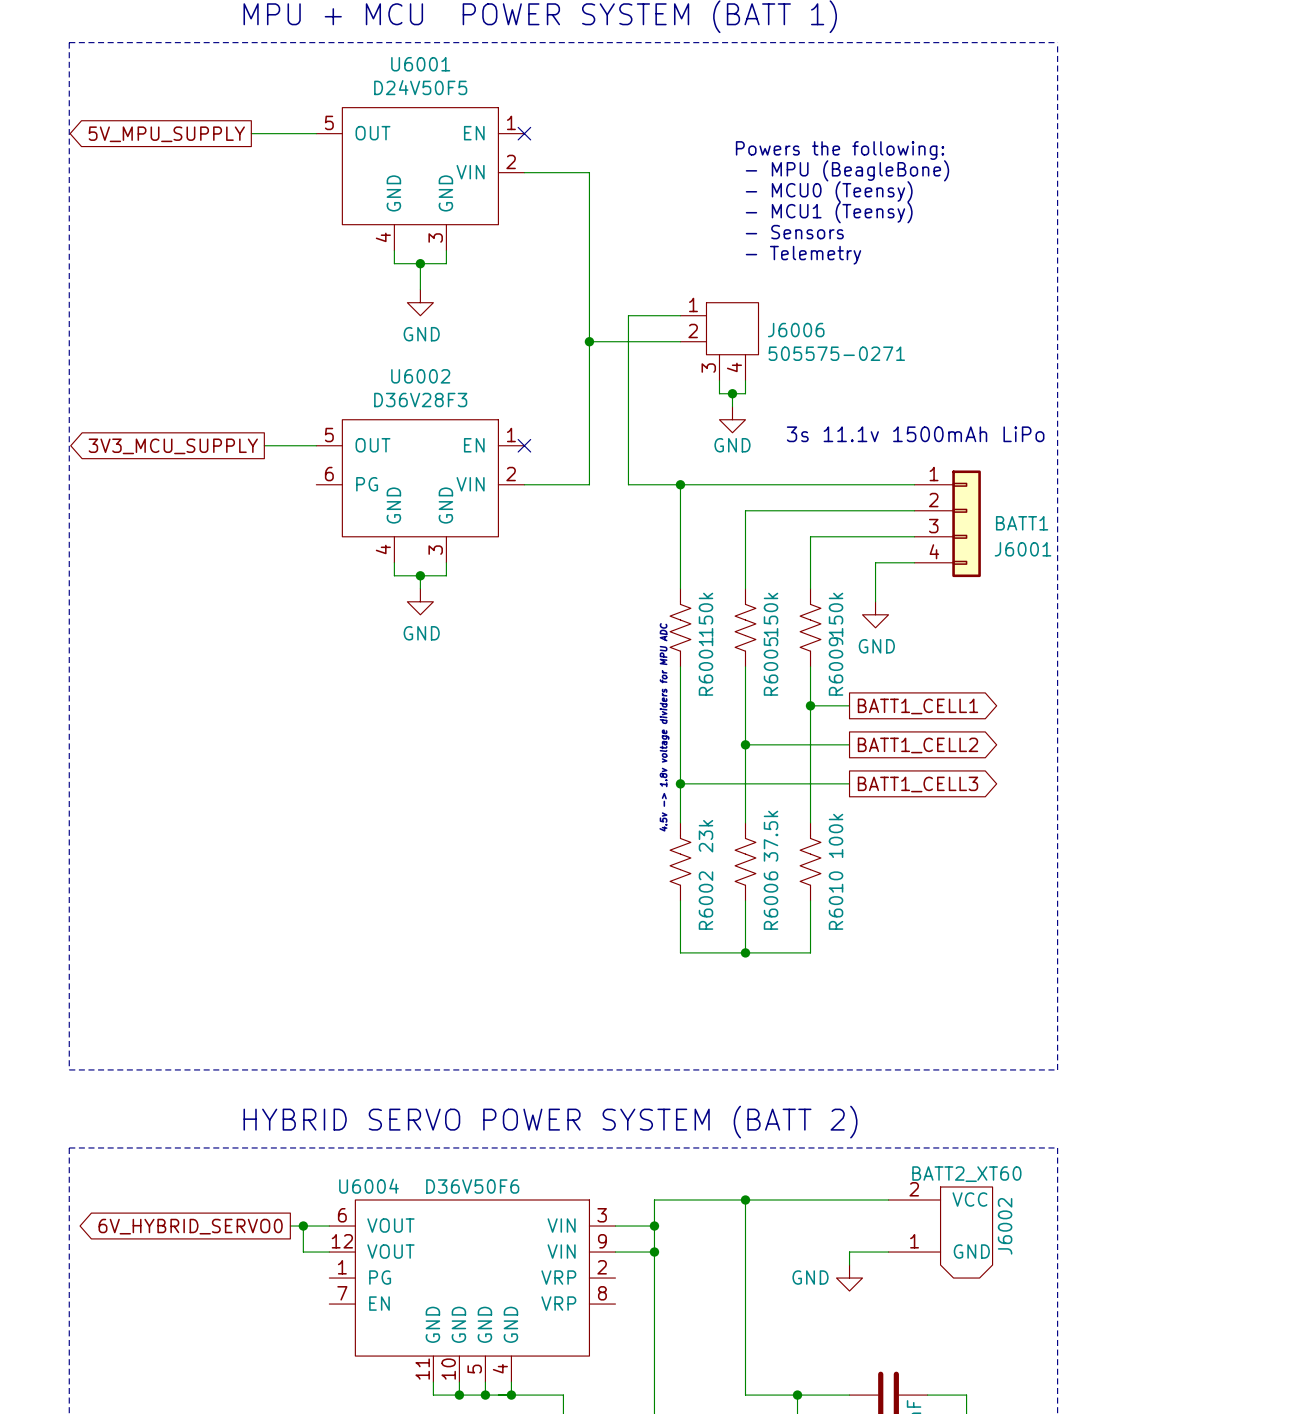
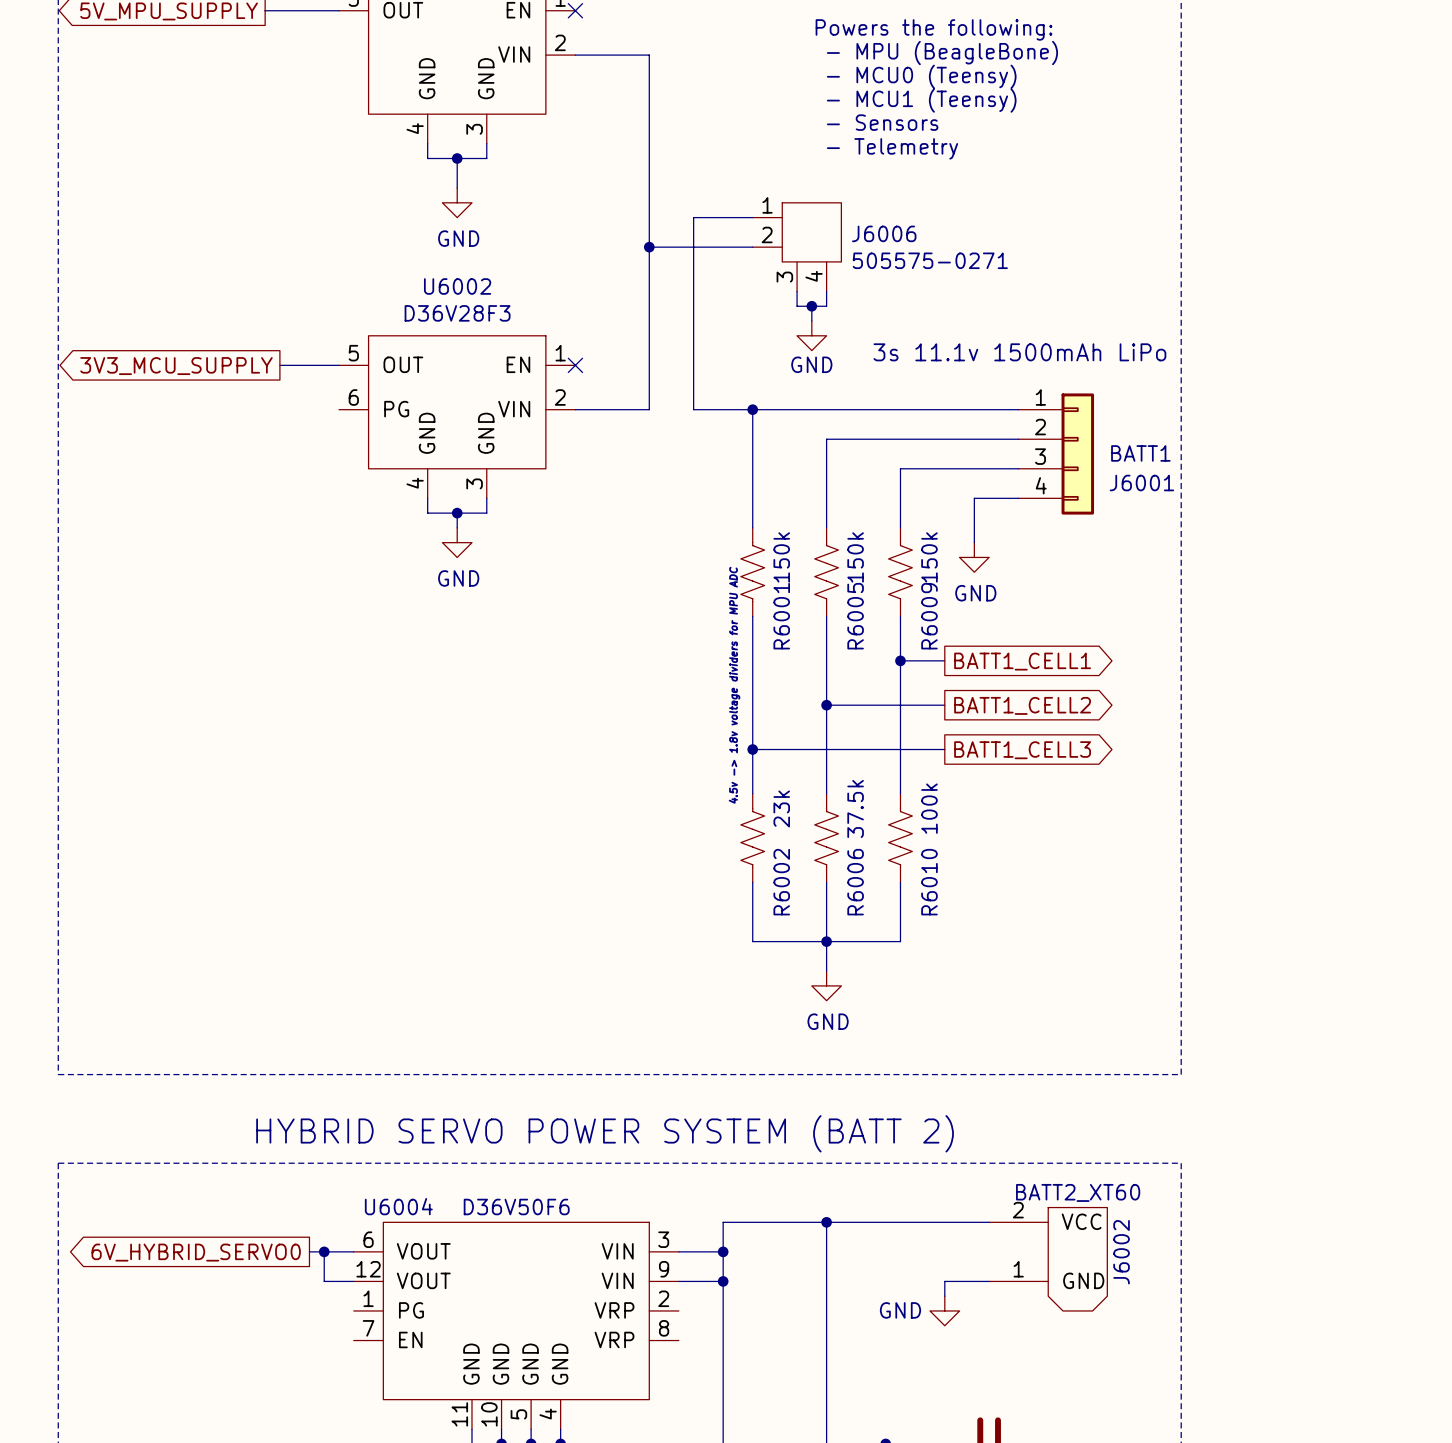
wire: none -> (826, 941) (826, 971)
power symbol: none -> GND (826, 985)

